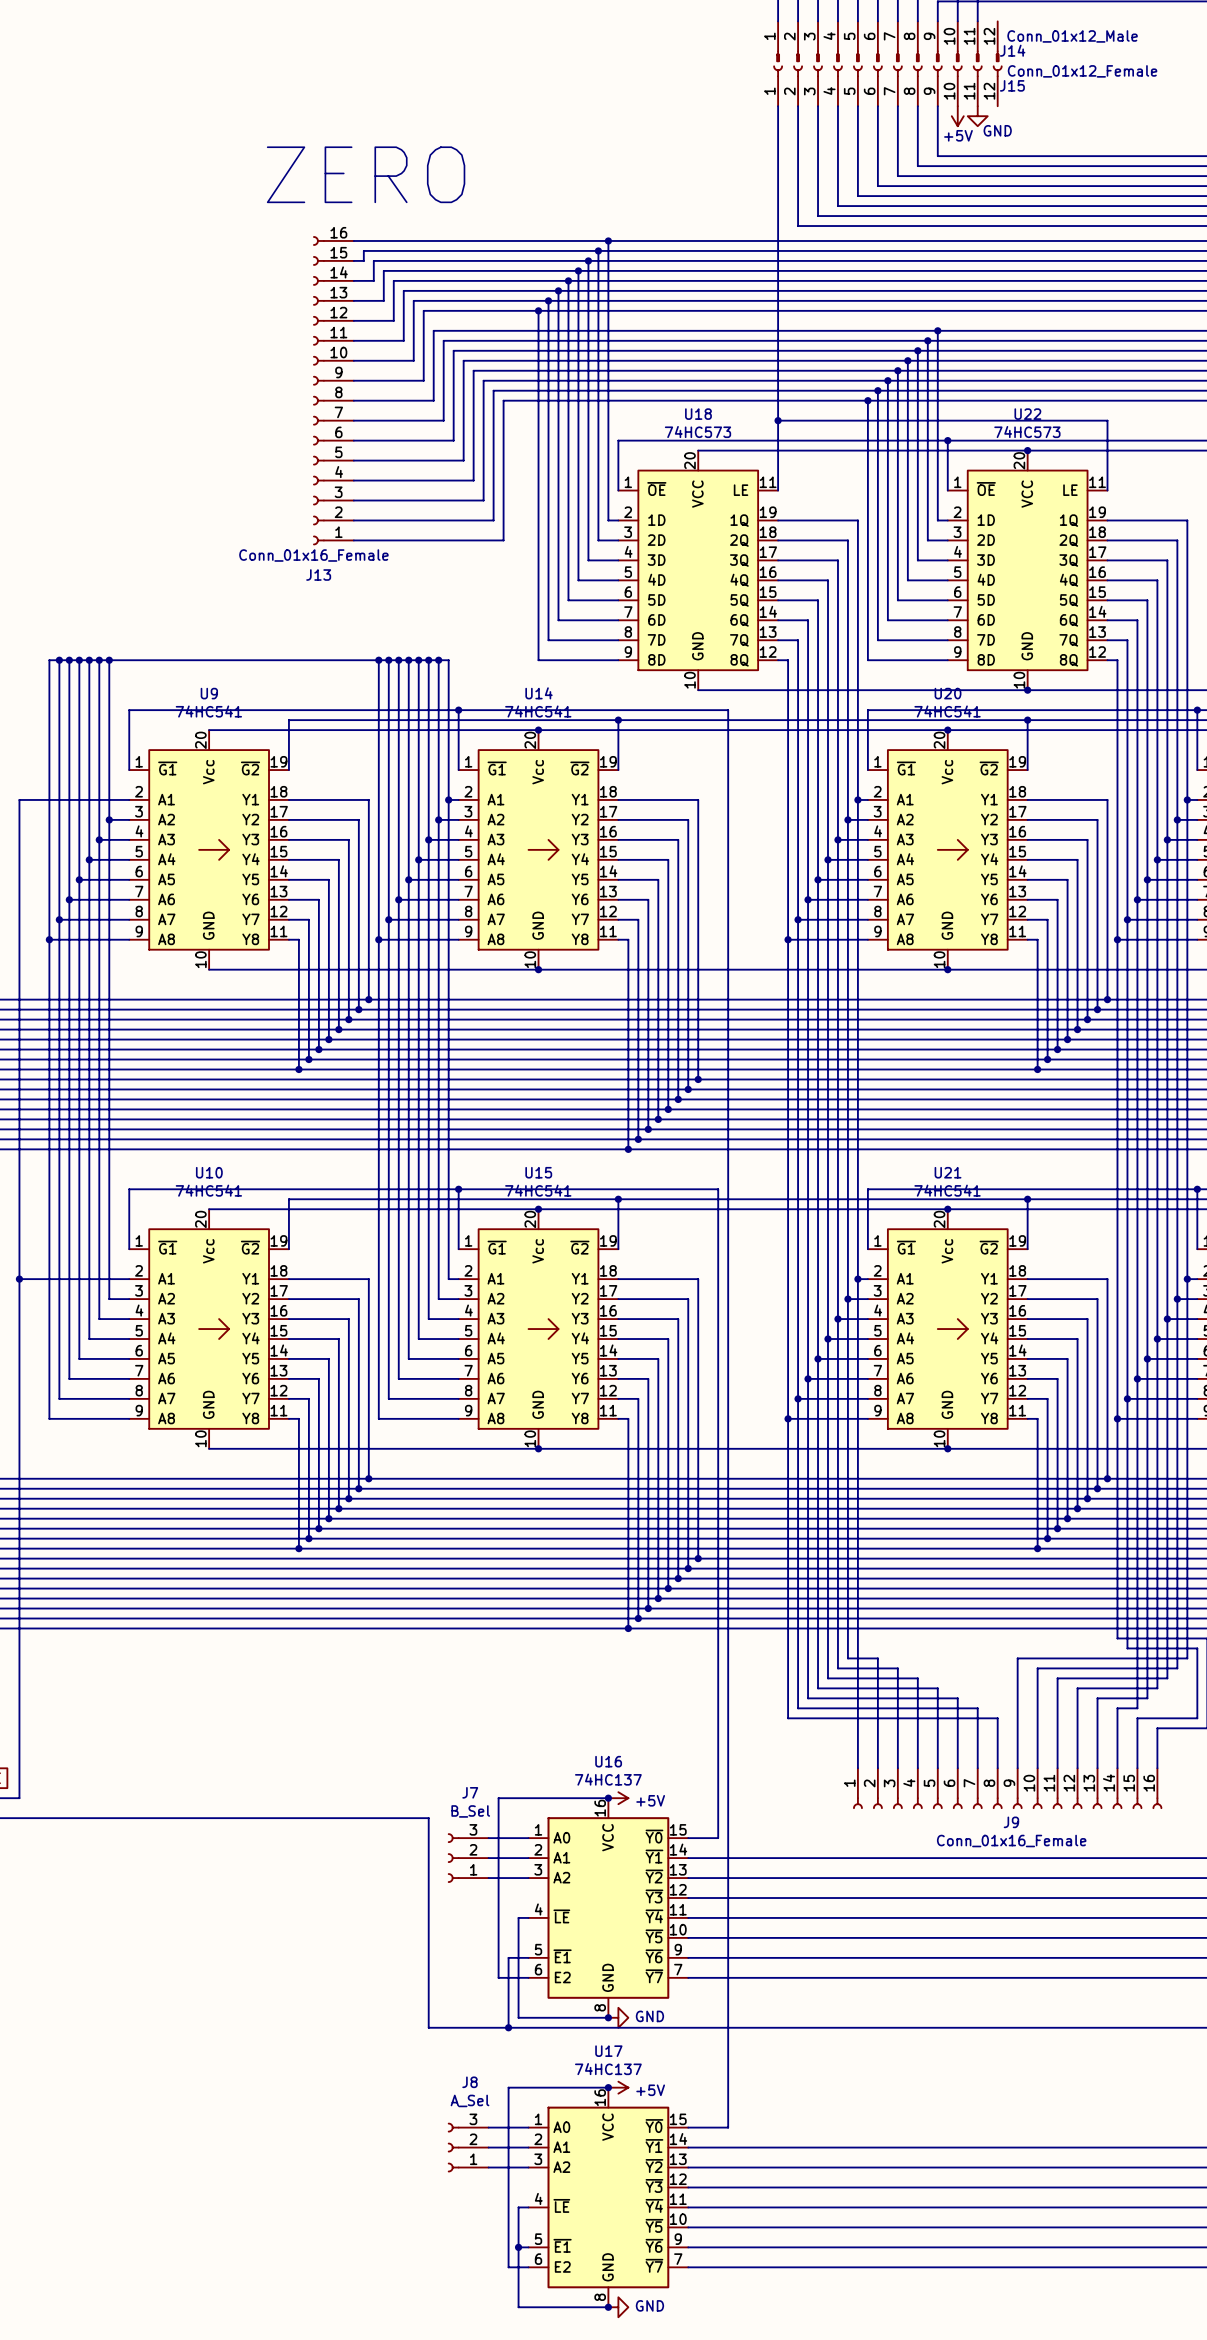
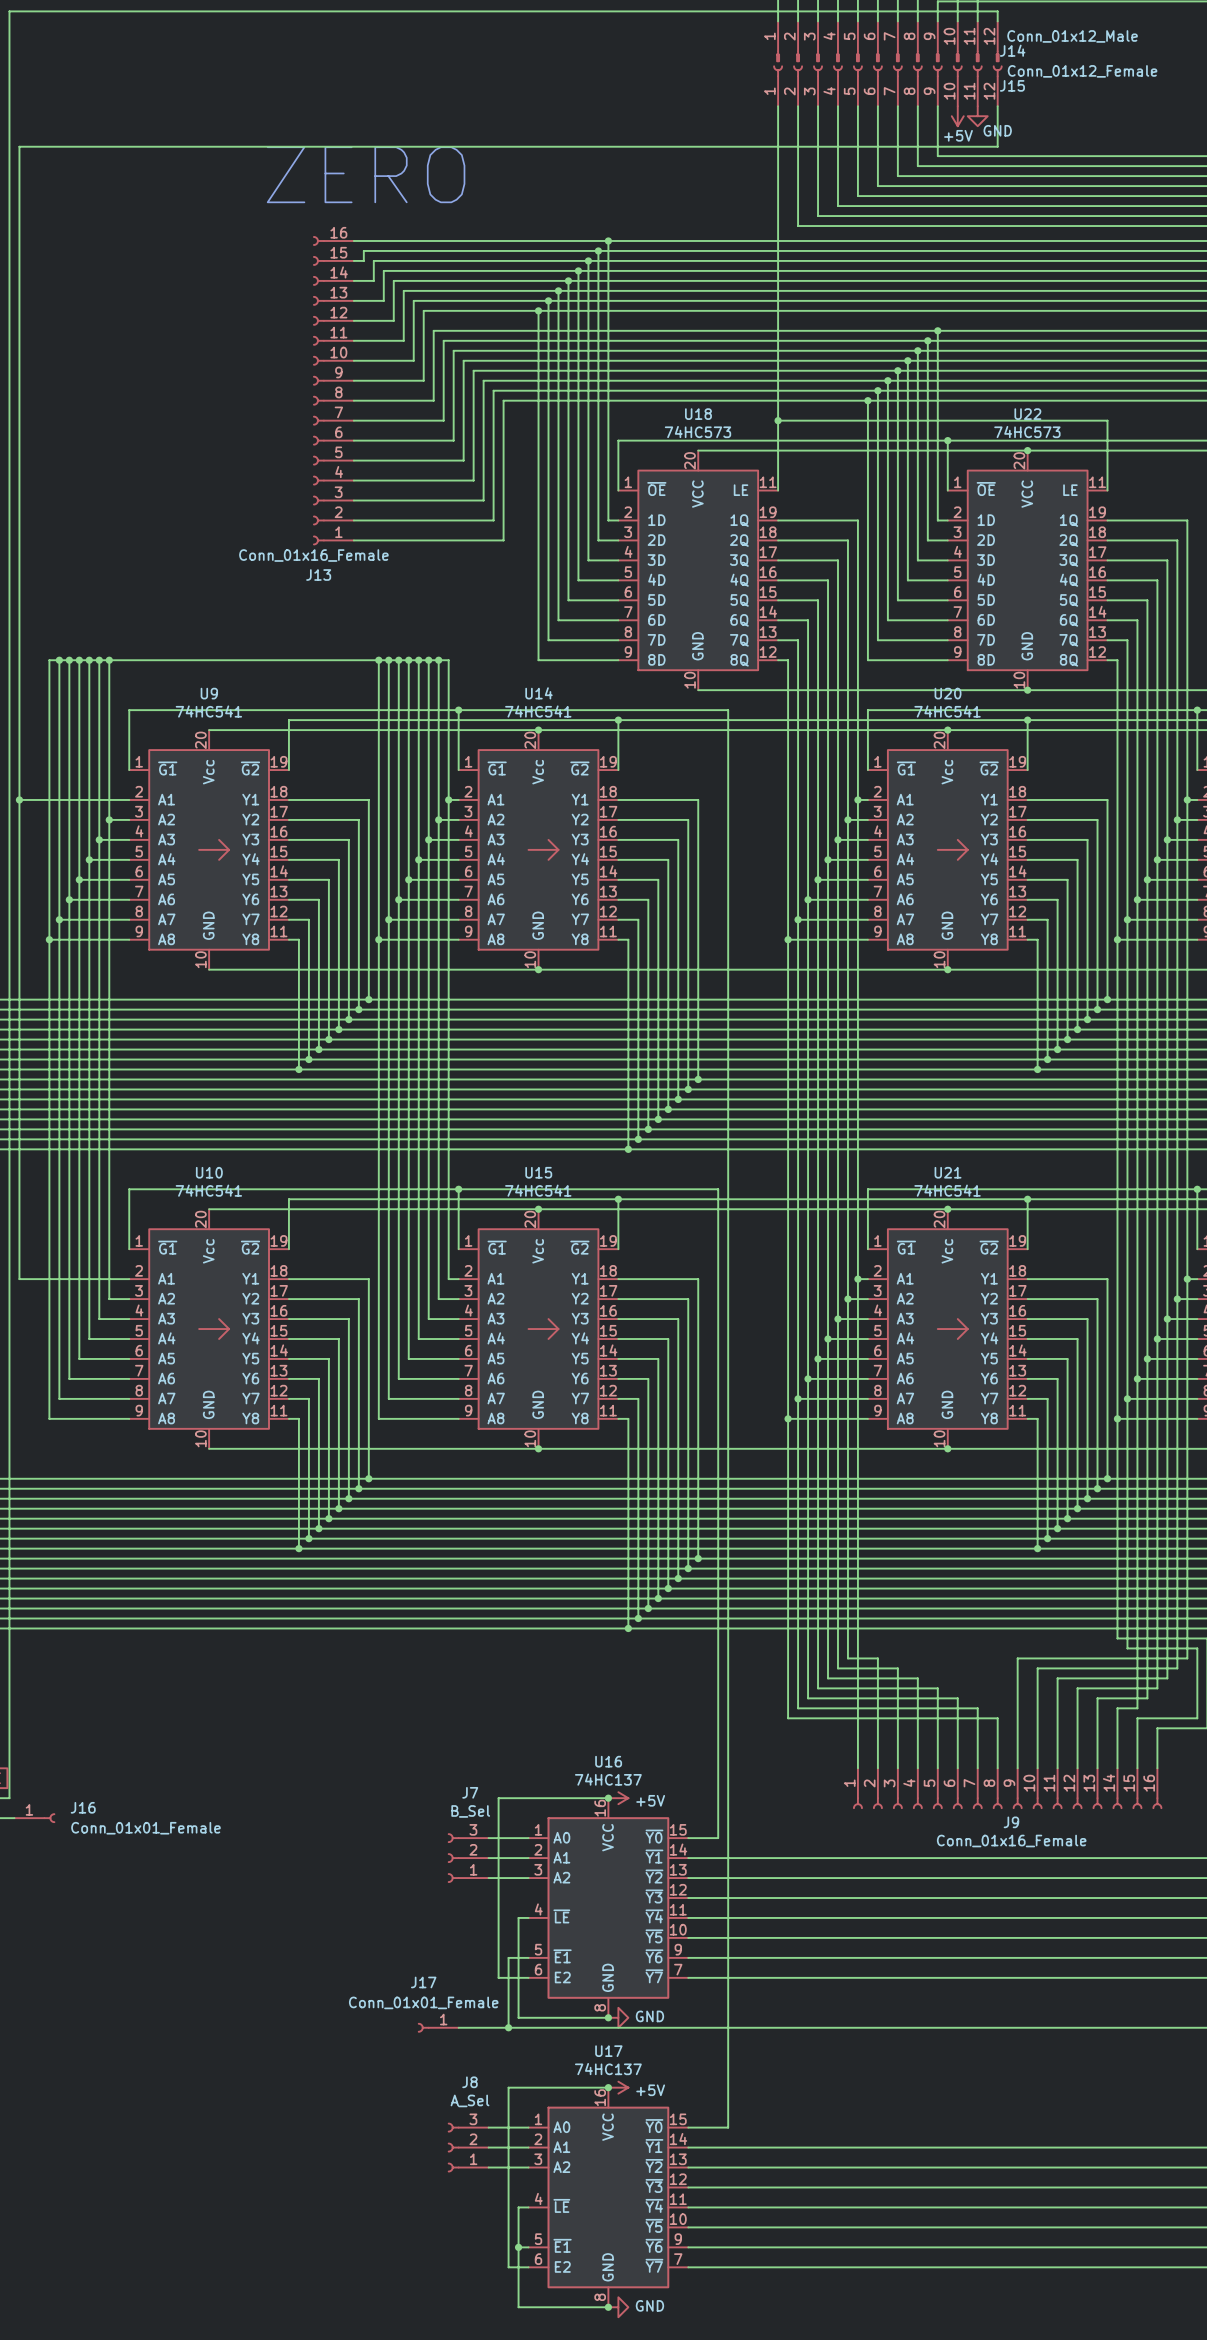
wire: none -> (997, 106) (997, 146) (19, 146) (19, 799)
junction: none -> (19, 799)
wire: (19, 1279) (19, 1798) (9, 1798) -> (997, 21) (997, 11) (9, 11) (9, 1798)
junction: (19, 1279) -> none
wire: (14, 1818) (428, 1818) (428, 2027) (458, 2027) -> none
J16: none -> Conn_01x01_Female (34, 1818)
J17: none -> Conn_01x01_Female (438, 2027)

